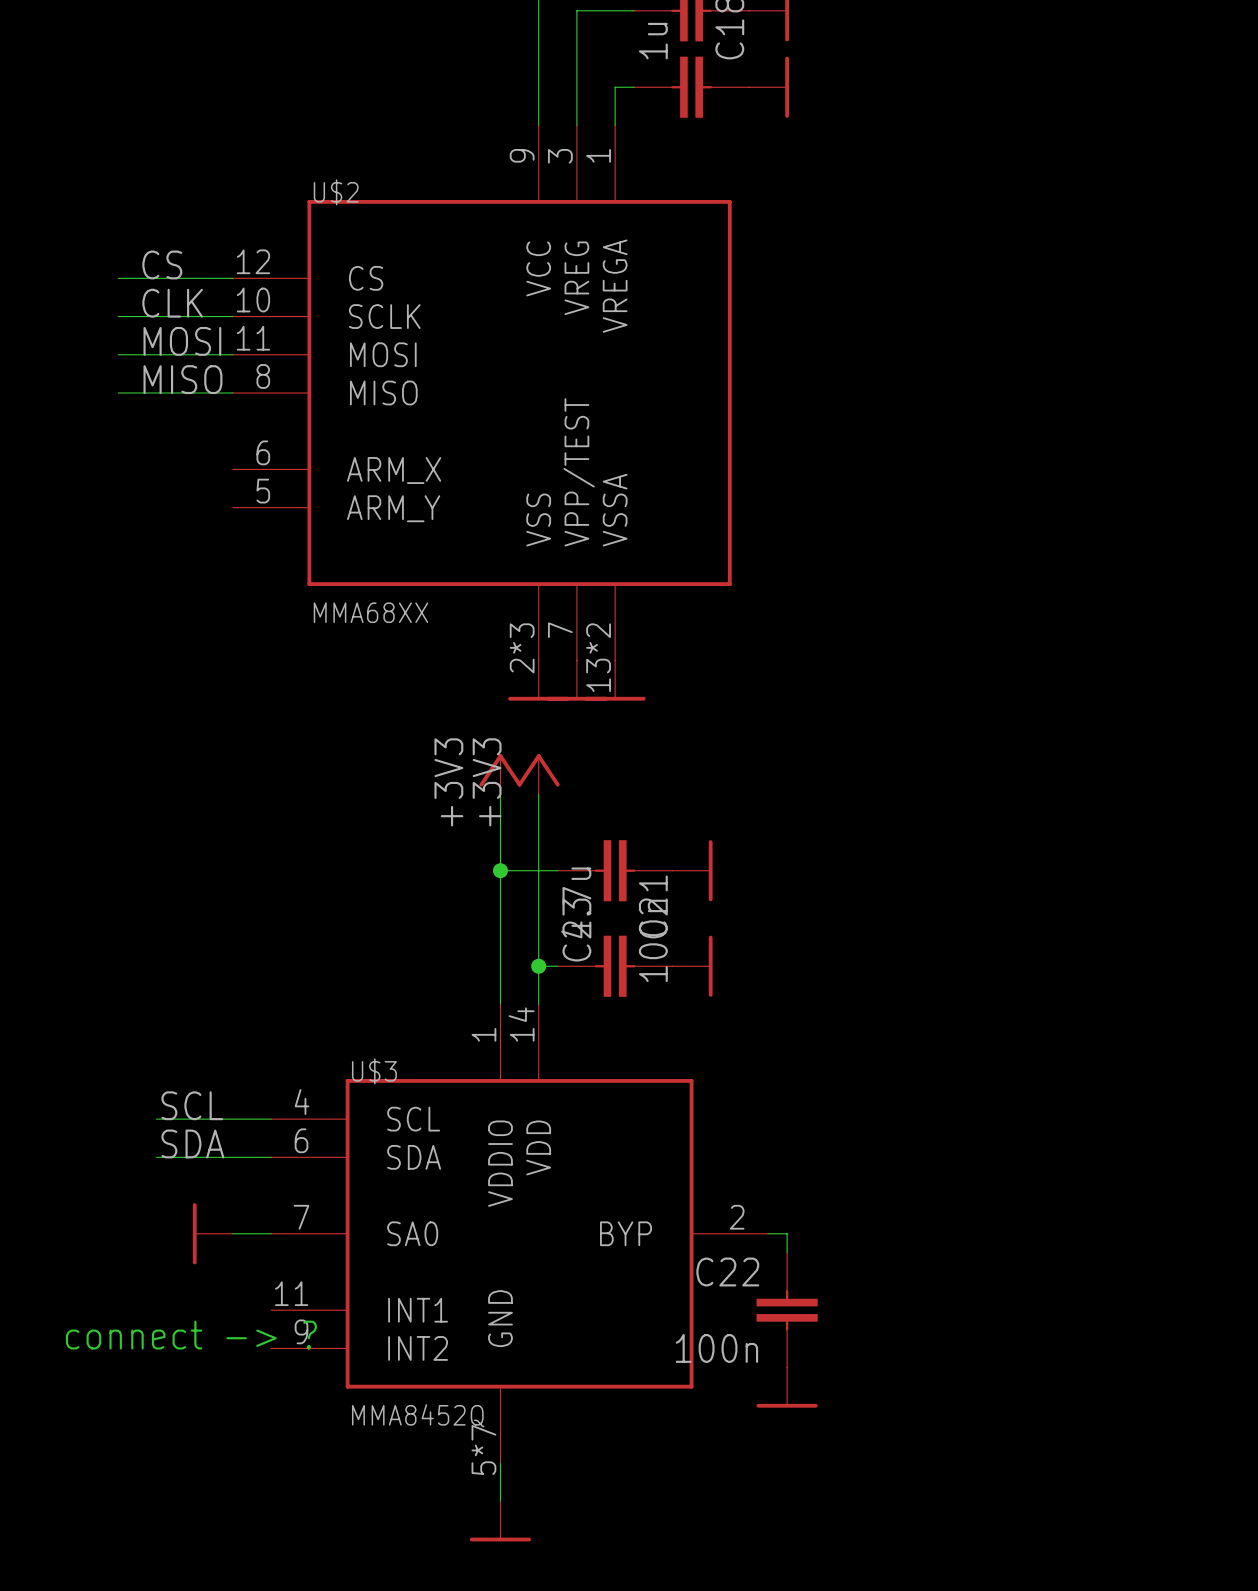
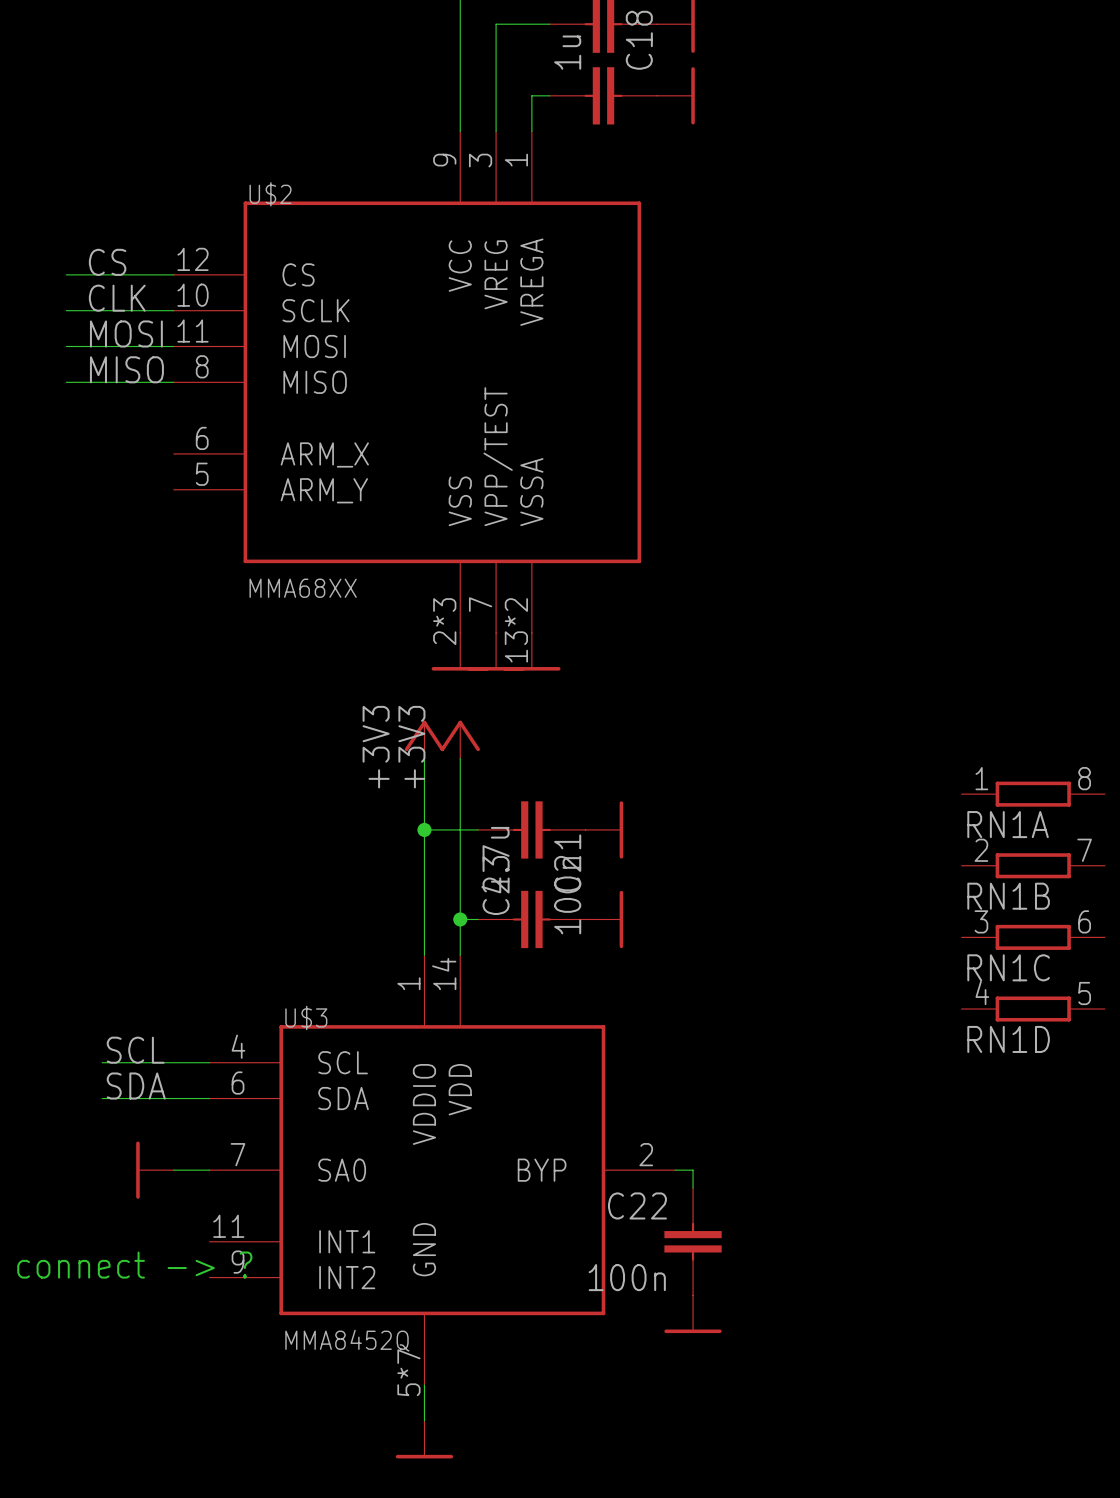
RN1A: none -> (1033, 794)
RN1B: none -> (1033, 865)
RN1C: none -> (1033, 937)
RN1D: none -> (1033, 1009)

